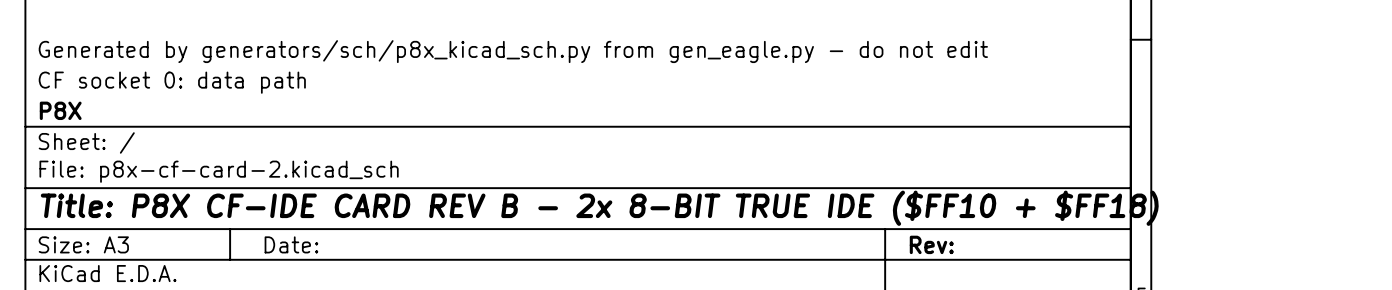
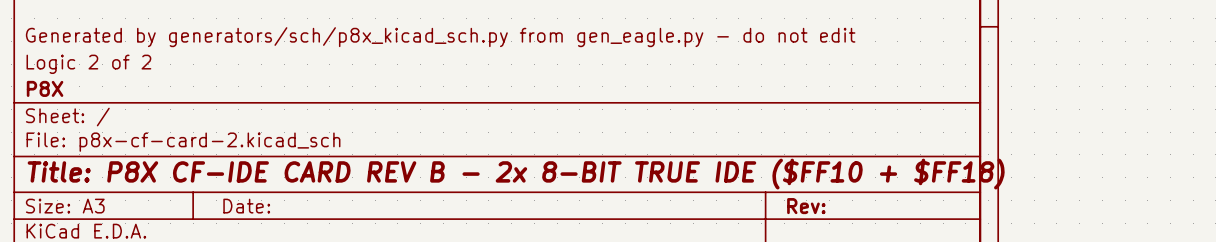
title block: CF socket 0: data path (172, 82) -> Logic 2 of 2 (88, 64)

